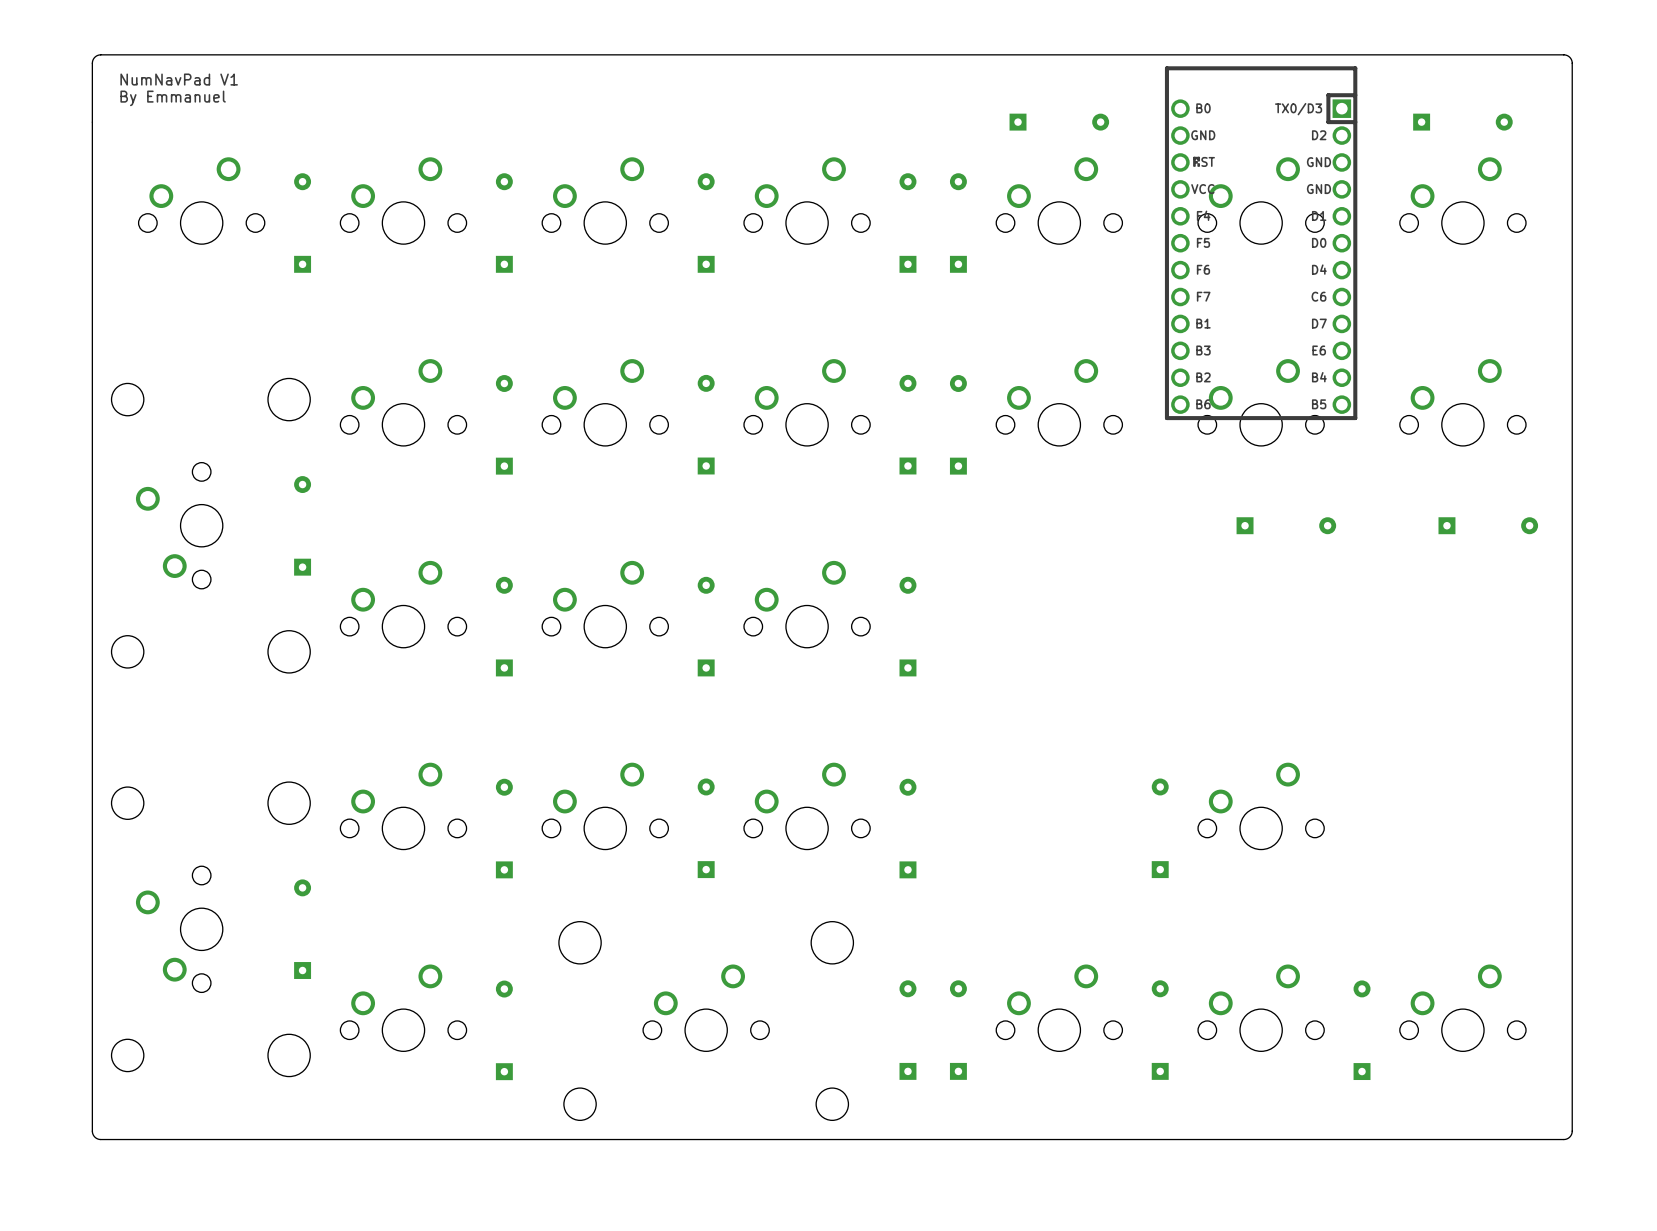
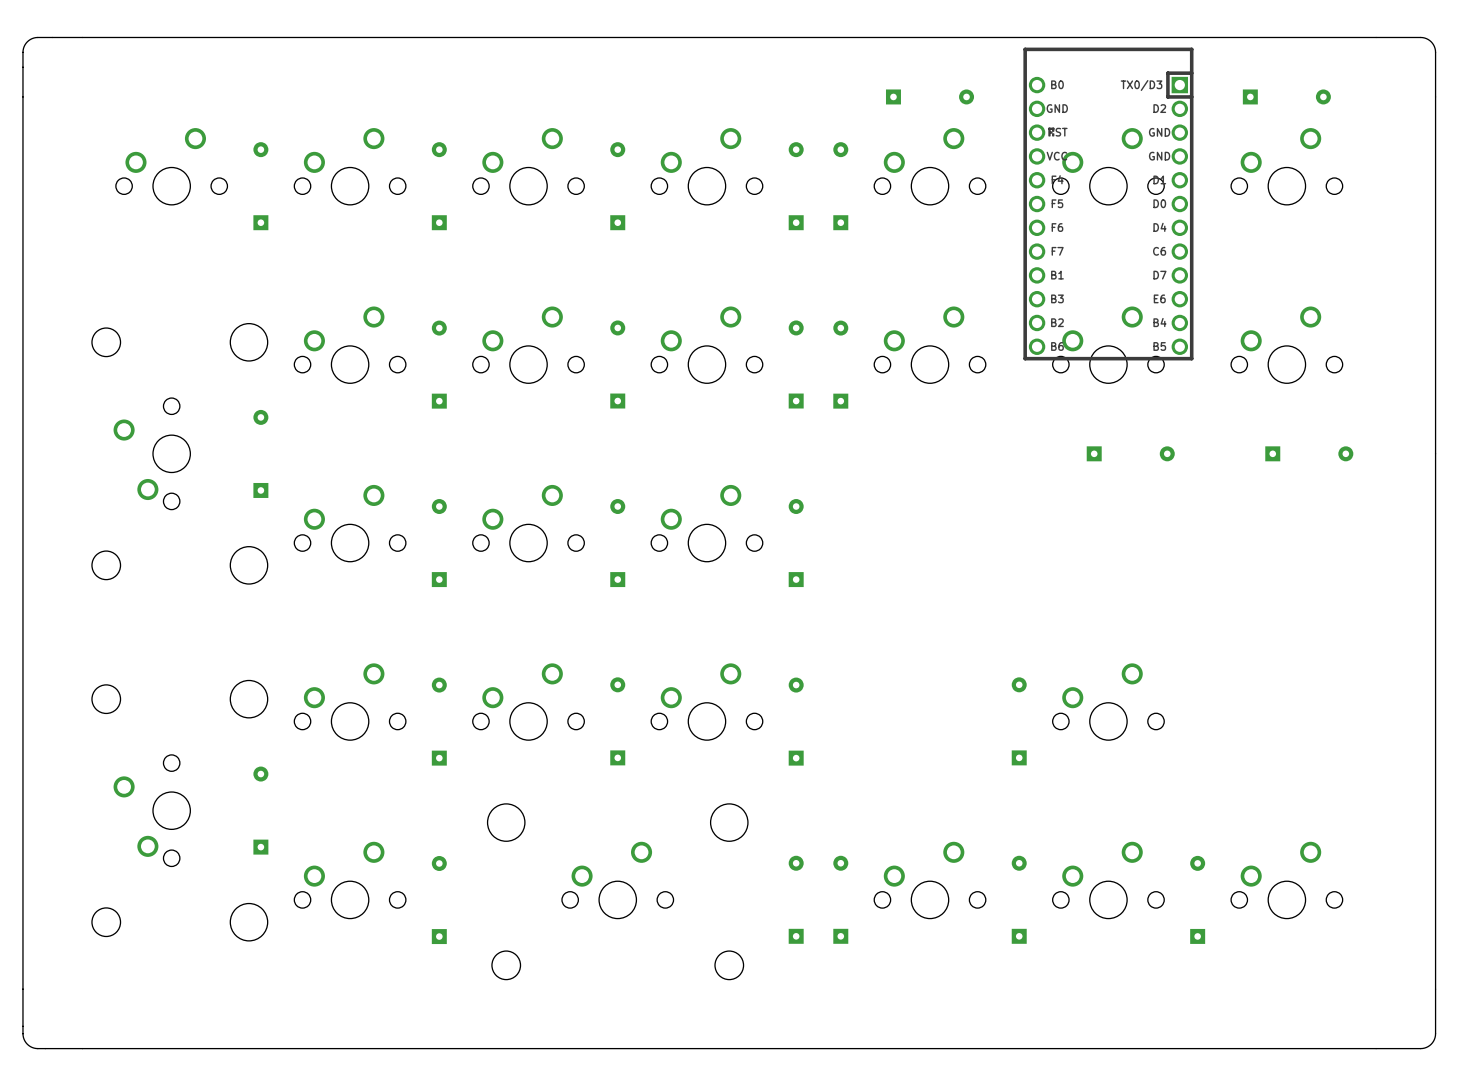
board edge: (100, 54) (94, 57) (92, 63) (92, 1131) (95, 1137) (100, 1139) (1563, 1139) (1569, 1137) (1572, 1131) (1572, 63) (1569, 57) (1563, 54) -> (82, 37) (34, 37) (26, 43) (22, 52) (22, 1033) (27, 1044) (37, 1048) (1420, 1048) (1429, 1045) (1434, 1039) (1435, 1033) (1435, 52) (1432, 43) (1424, 37) (1376, 37)
text: NumNavPad V1 (179, 79) -> none
text: By Emmanuel (173, 98) -> none

